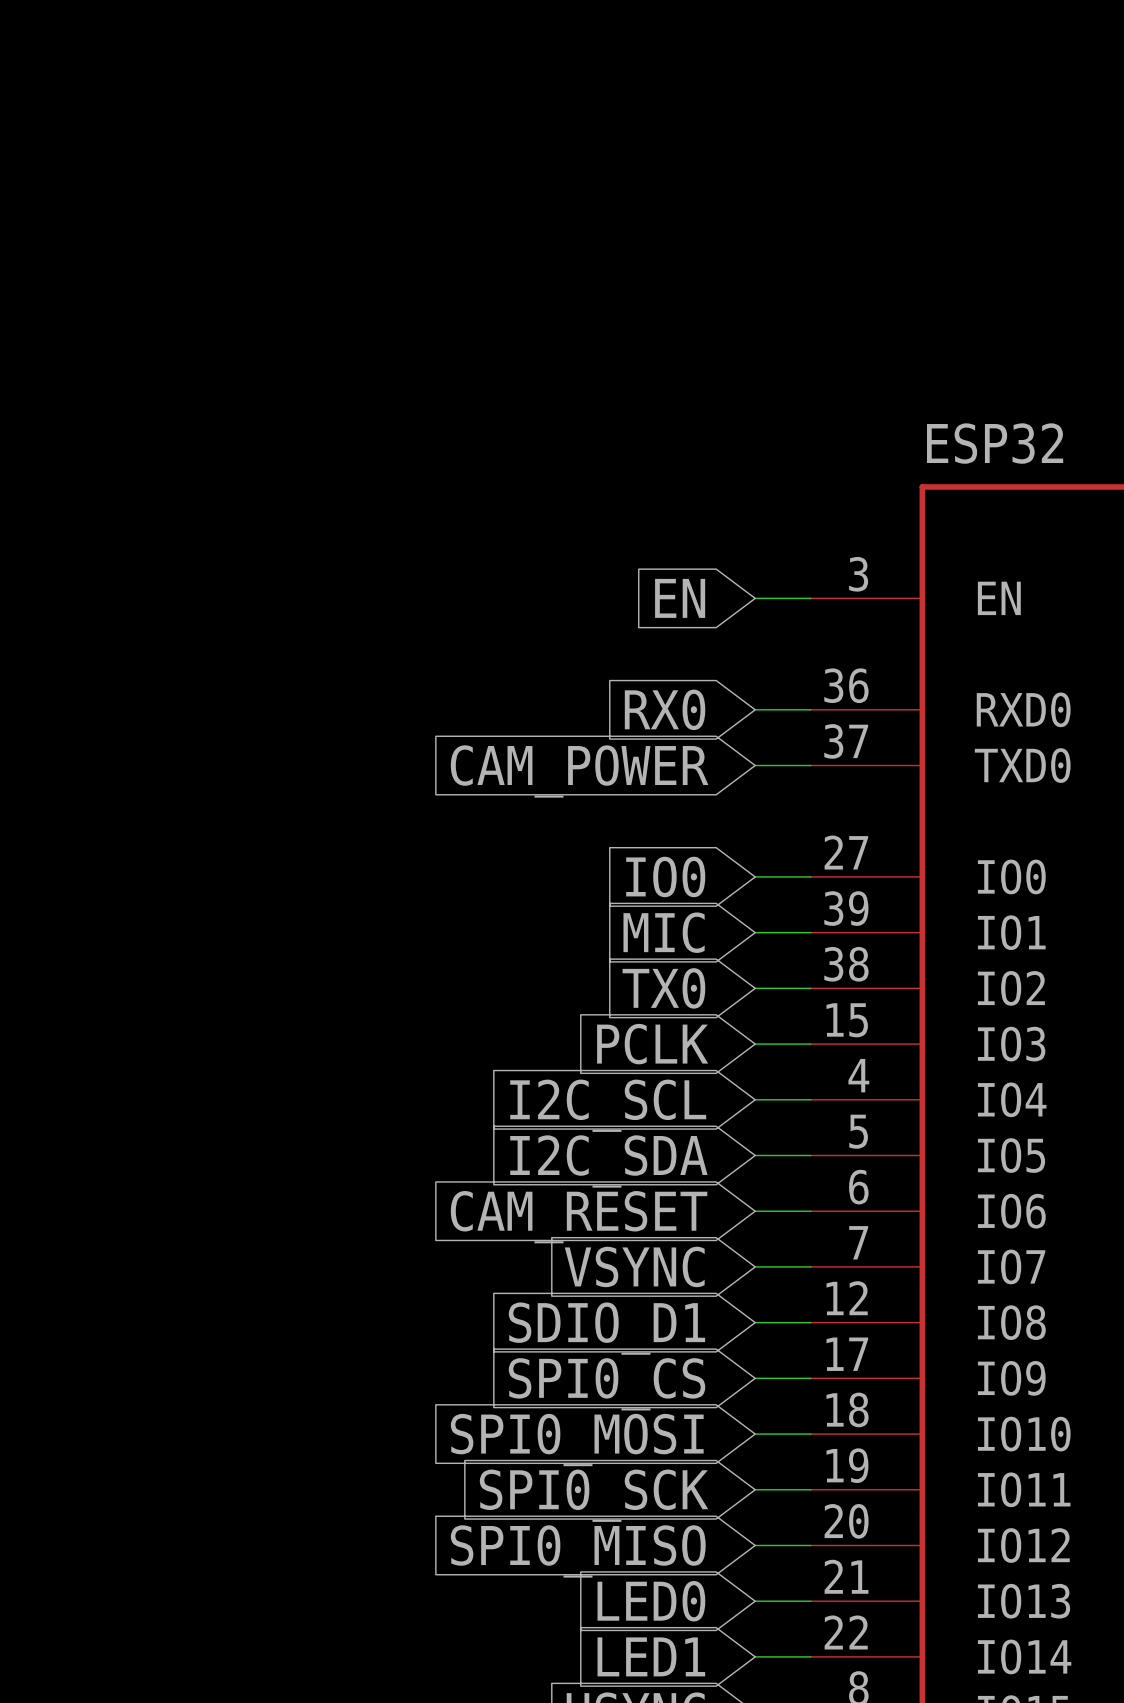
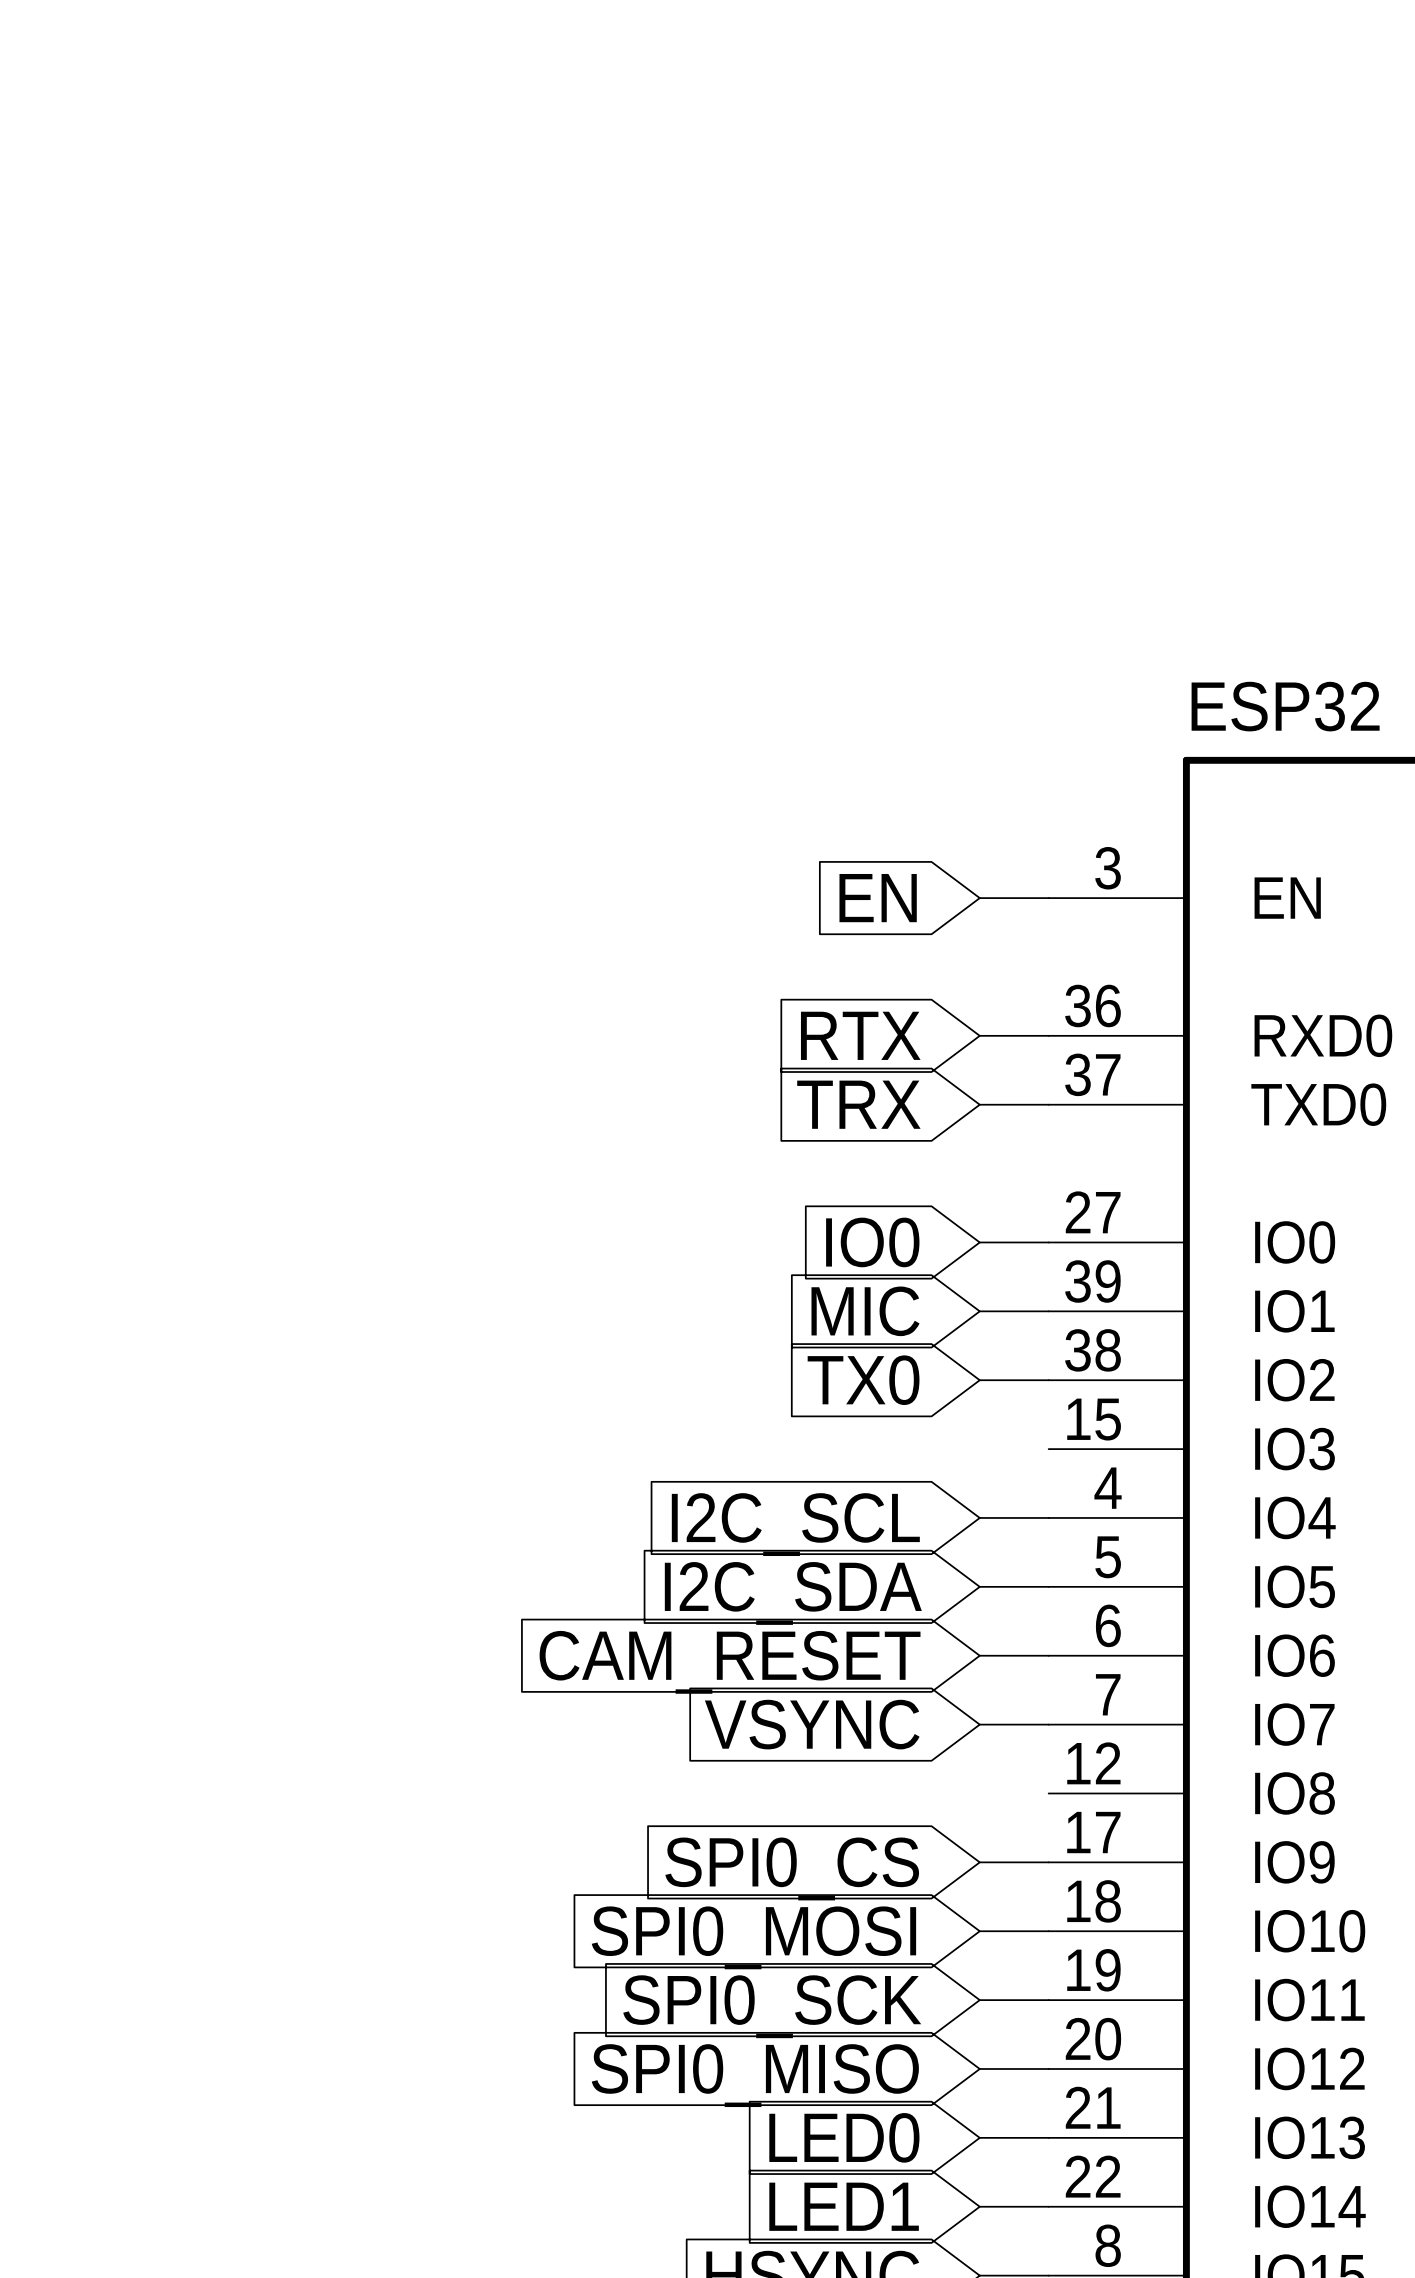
global label: RX0 (665, 709) -> RTX (860, 1035)
global label: CAM_POWER (579, 771) -> TRX (858, 1104)
global label: PCLK (652, 1044) -> none
wire: (755, 1044) (810, 1044) -> none
wire: (755, 1322) (810, 1322) -> none
global label: SDIO_D1 (606, 1328) -> none

